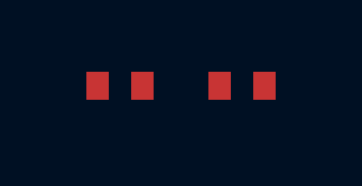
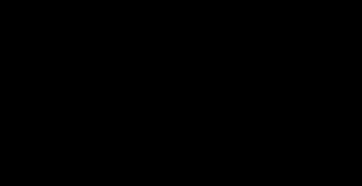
part: (119, 85) -> none
part: (242, 85) -> none

